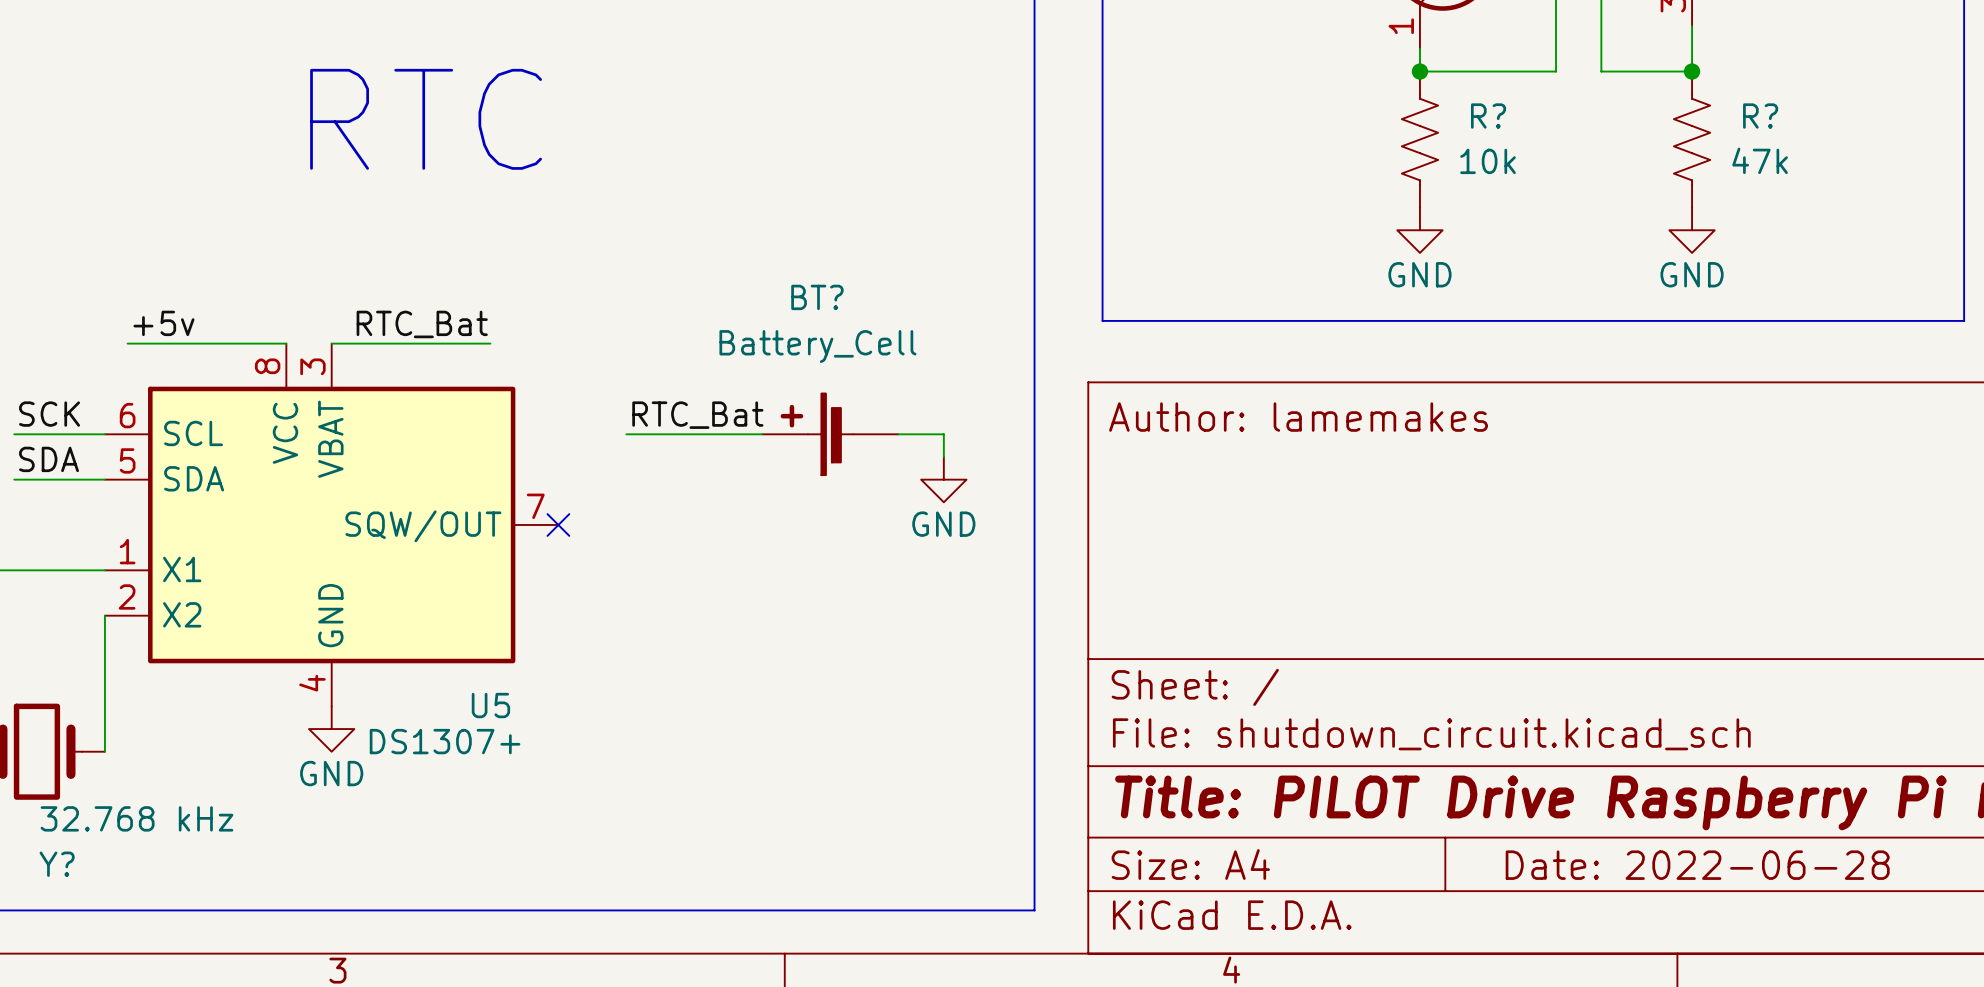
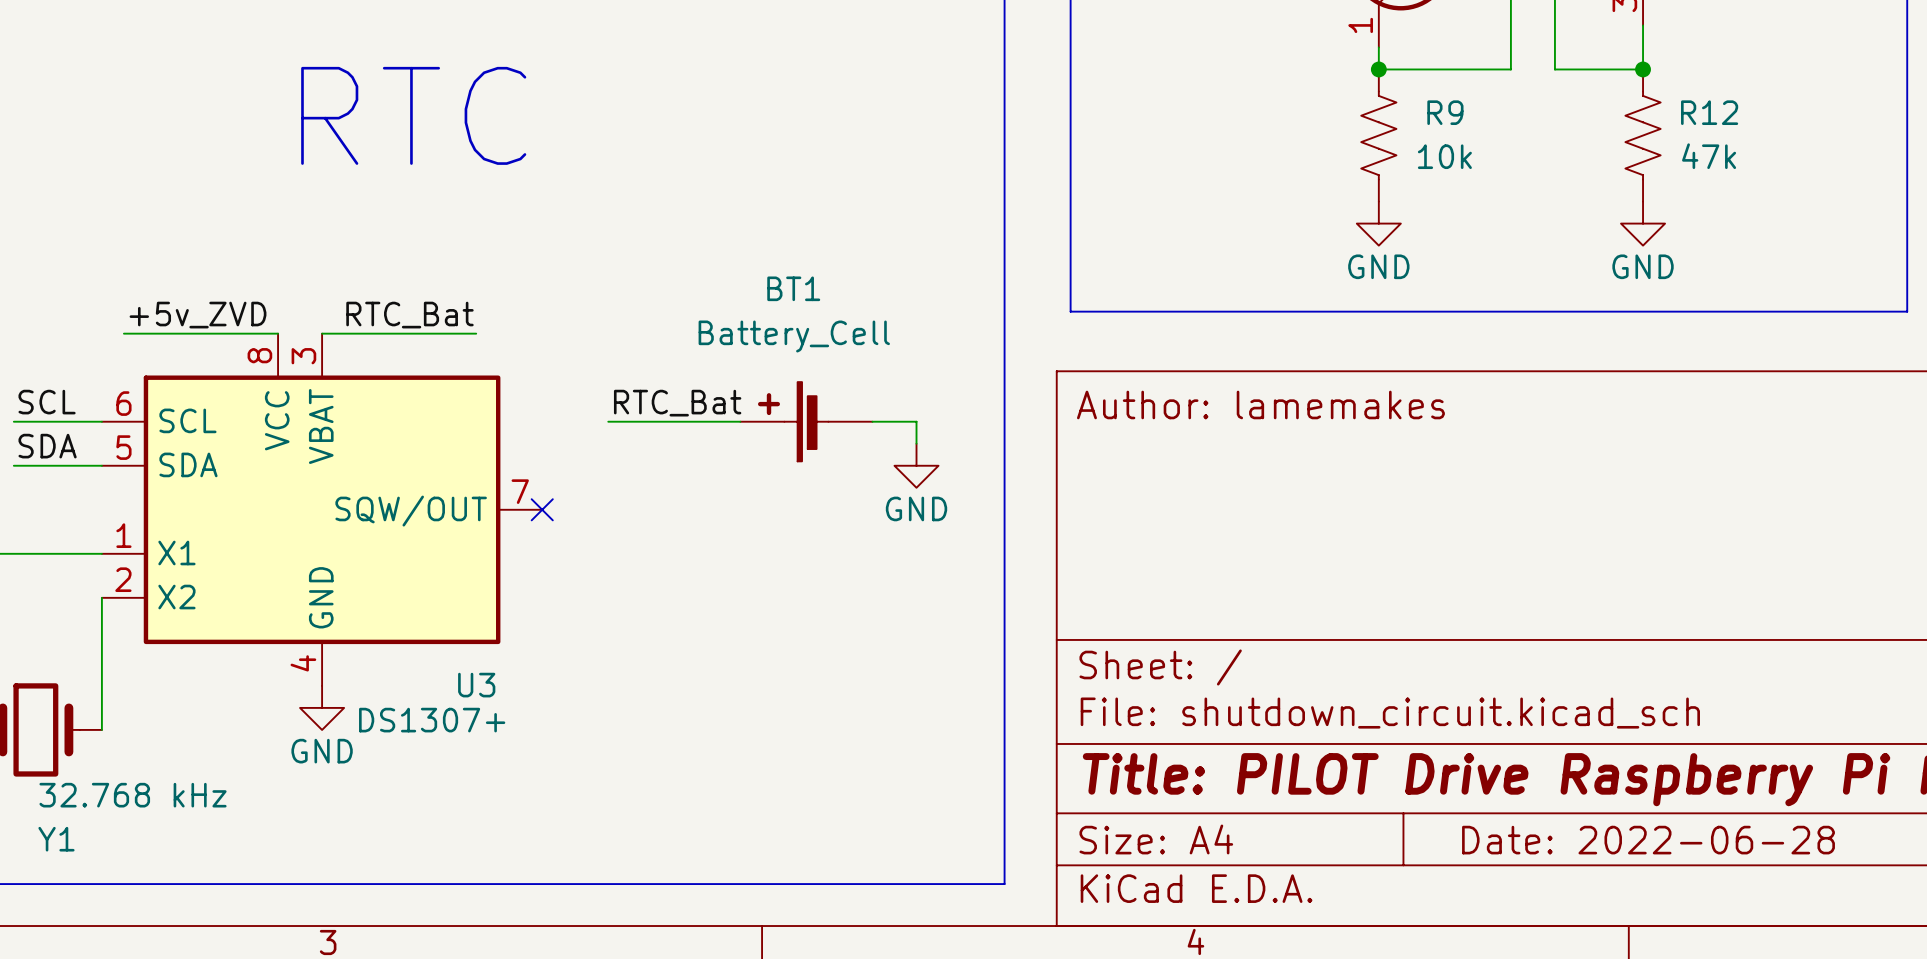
R? name: R? (1488, 116) -> R9 (1445, 112)
R? name: R? (1760, 116) -> R12 (1709, 112)
BT? name: BT? (817, 297) -> BT1 (793, 288)
label: +5v (163, 323) -> +5v_ZVD (198, 315)
label: SCK (49, 414) -> SCL (47, 402)
U5 name: U5 (490, 705) -> U3 (476, 685)
Y? name: Y? (57, 864) -> Y1 (56, 839)

